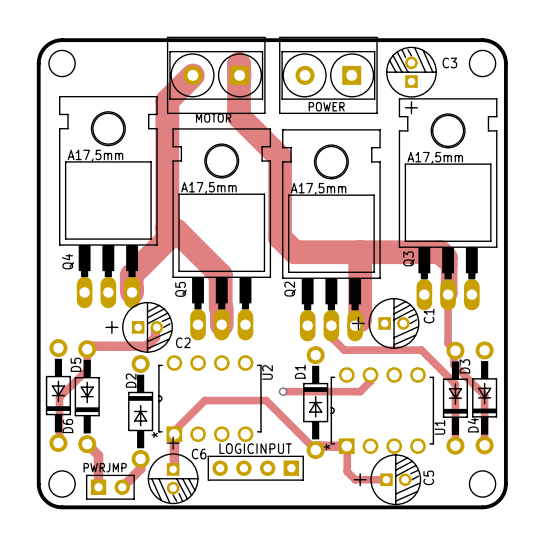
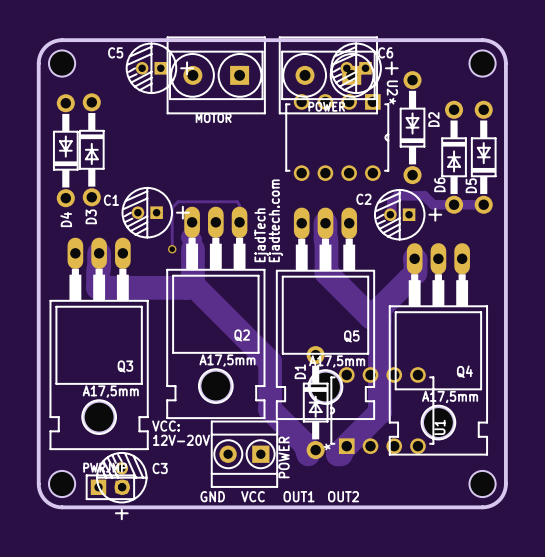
track: (192, 75) (167, 100) (167, 239) (131, 275) (132, 292) -> none
track: (239, 75) (239, 64) (239, 116) (280, 157) (280, 237) (294, 252) (440, 252) (449, 264) (448, 343) (455, 350) -> none
C3 position: (411, 80) -> (121, 486)
Q4 footprint: [59, 96, 158, 309] -> [389, 243, 488, 456]
Q3 footprint: [398, 98, 498, 311] -> [49, 237, 149, 450]
Q5 footprint: [172, 128, 271, 341] -> [276, 207, 375, 420]
Q2 footprint: [282, 129, 381, 342] -> [166, 206, 266, 419]
track: none -> (483, 204) (433, 204) (424, 195) (397, 195) (391, 201) (390, 214)
text: none -> Ejadtech.com (275, 220)
track: none -> (239, 222) (239, 205) (237, 201) (178, 201) (172, 207) (172, 249)
track: none -> (325, 223) (326, 272) (370, 317) (376, 317) (379, 320)
track: (167, 227) (170, 230) (176, 230) (220, 275) (221, 324) -> none
text: none -> EjadTech (261, 235)
track: none -> (190, 237) (192, 240) (192, 284) (270, 361) (270, 409) (305, 444) (308, 454)
via: none -> (172, 249)
track: (360, 252) (360, 320) (355, 325) -> none
track: none -> (99, 253) (98, 287) (187, 287) (192, 281)
Q3 name position: Q3 (409, 258) -> Q3 (125, 366)
track: none -> (414, 258) (415, 272) (379, 308) (379, 412) (337, 454) (340, 454)
Q4 name position: Q4 (67, 261) -> Q4 (464, 371)
Q5 name position: Q5 (180, 289) -> Q5 (351, 336)
Q2 name position: Q2 (290, 289) -> Q2 (242, 335)
C1 name position: C1 (429, 316) -> C1 (111, 200)
C1 rotation: 0° (385, 323) -> 180° (155, 212)
C1 position: (385, 323) -> (155, 212)
track: (331, 325) (332, 338) (344, 350) (421, 350) (455, 384) (455, 445) -> none
C2 rotation: 0° (139, 327) -> 180° (408, 214)
C2 position: (139, 327) -> (408, 214)
track: (156, 327) (155, 337) (146, 346) (87, 347) (87, 369) (59, 397) (58, 443) -> none
track: (456, 349) (454, 352) (454, 364) (484, 395) (484, 445) -> none
D3 name position: D3 (464, 366) -> D3 (91, 216)
U2 name position: U2 (267, 372) -> U2 (392, 88)
track: (370, 374) (370, 381) (360, 391) (283, 391) -> none
D2 name position: D2 (131, 380) -> D2 (433, 119)
via: (283, 391) -> none
D6 position: (58, 395) -> (483, 157)
D5 rotation: 0° (87, 396) -> 180° (454, 157)
D5 position: (87, 396) -> (454, 157)
D4 position: (484, 397) -> (65, 150)
U2 rotation: 0° (209, 398) -> 180° (337, 137)
U2 position: (209, 398) -> (337, 137)
D3 rotation: 0° (455, 398) -> 180° (91, 149)
D3 position: (455, 398) -> (91, 149)
D2 rotation: 0° (140, 411) -> 180° (412, 127)
D2 position: (140, 411) -> (412, 127)
D4 name position: D4 (473, 425) -> D4 (66, 219)
D6 name position: D6 (67, 426) -> D6 (439, 184)
text: none -> VCC: (166, 426)
text: none -> 12V-20V (181, 440)
track: (87, 444) (98, 455) (98, 487) -> none
POWER: none -> (244, 454)
track: (140, 458) (140, 468) (122, 487) -> none
LOGICINPUT: (255, 468) -> none
track: (173, 469) (174, 431) (204, 400) (266, 400) (315, 450) (319, 446) (346, 446) (347, 471) (355, 479) (386, 479) -> none
C6 rotation: 0° (173, 470) -> 90° clockwise (364, 68)
C6 position: (173, 470) -> (364, 68)
C5 rotation: 0° (387, 479) -> 180° (159, 68)
C5 position: (387, 479) -> (159, 68)
text: none -> GND (212, 496)
text: none -> VCC (253, 496)
text: none -> OUT1 (299, 496)
text: none -> OUT2 (343, 496)

